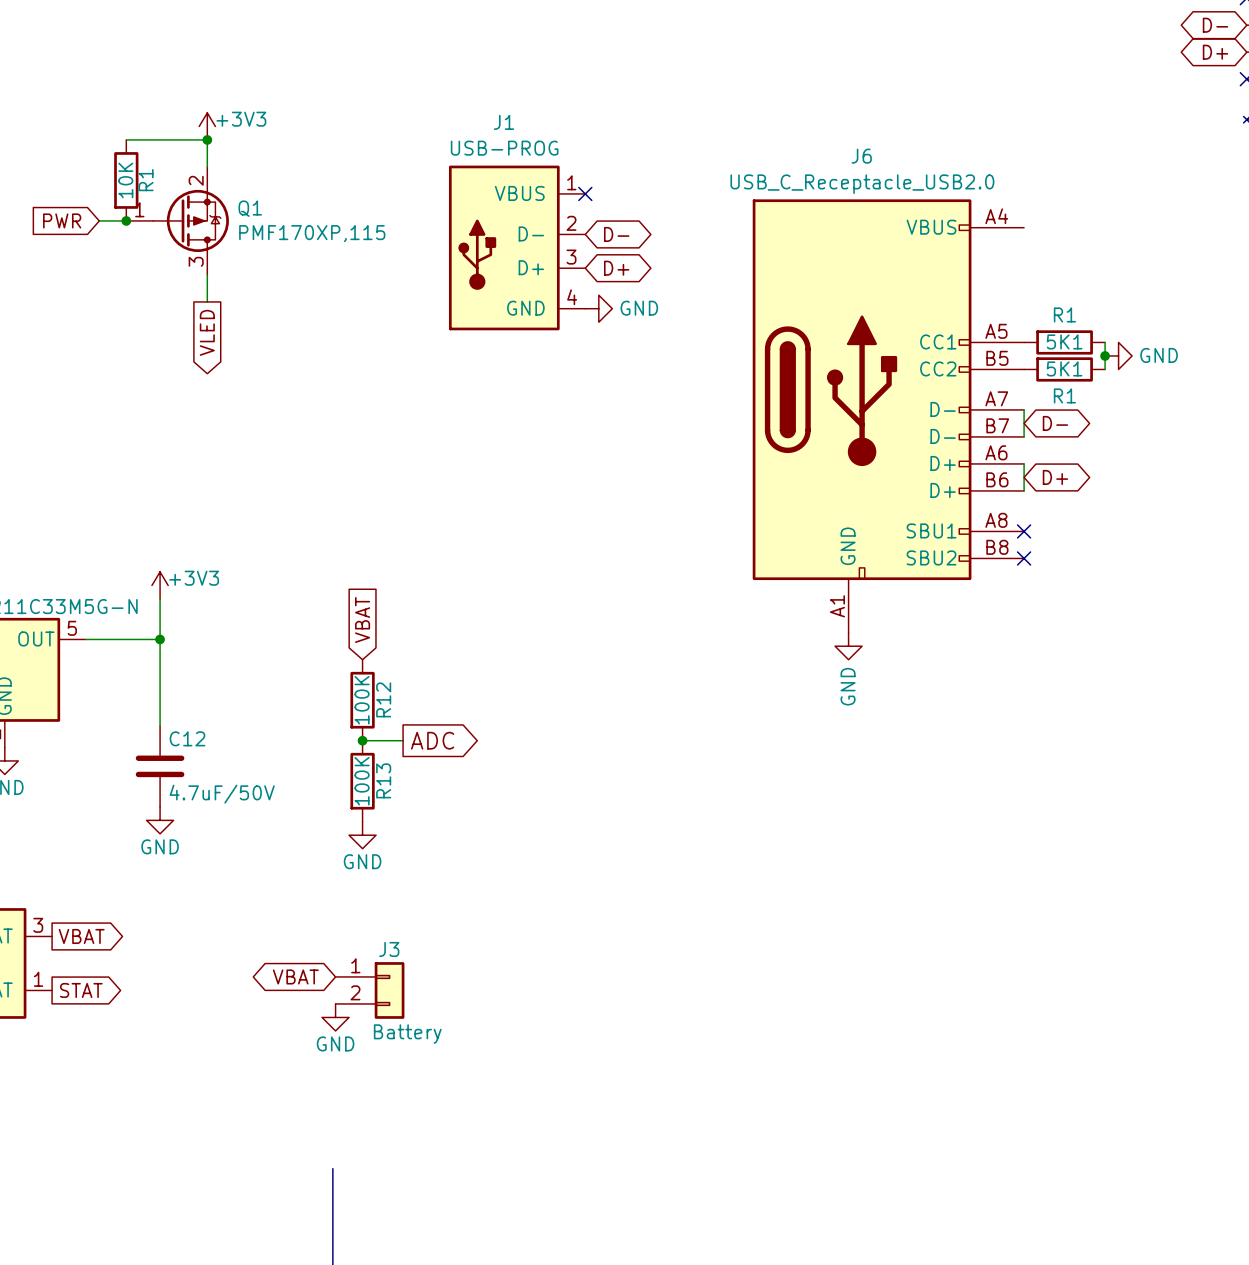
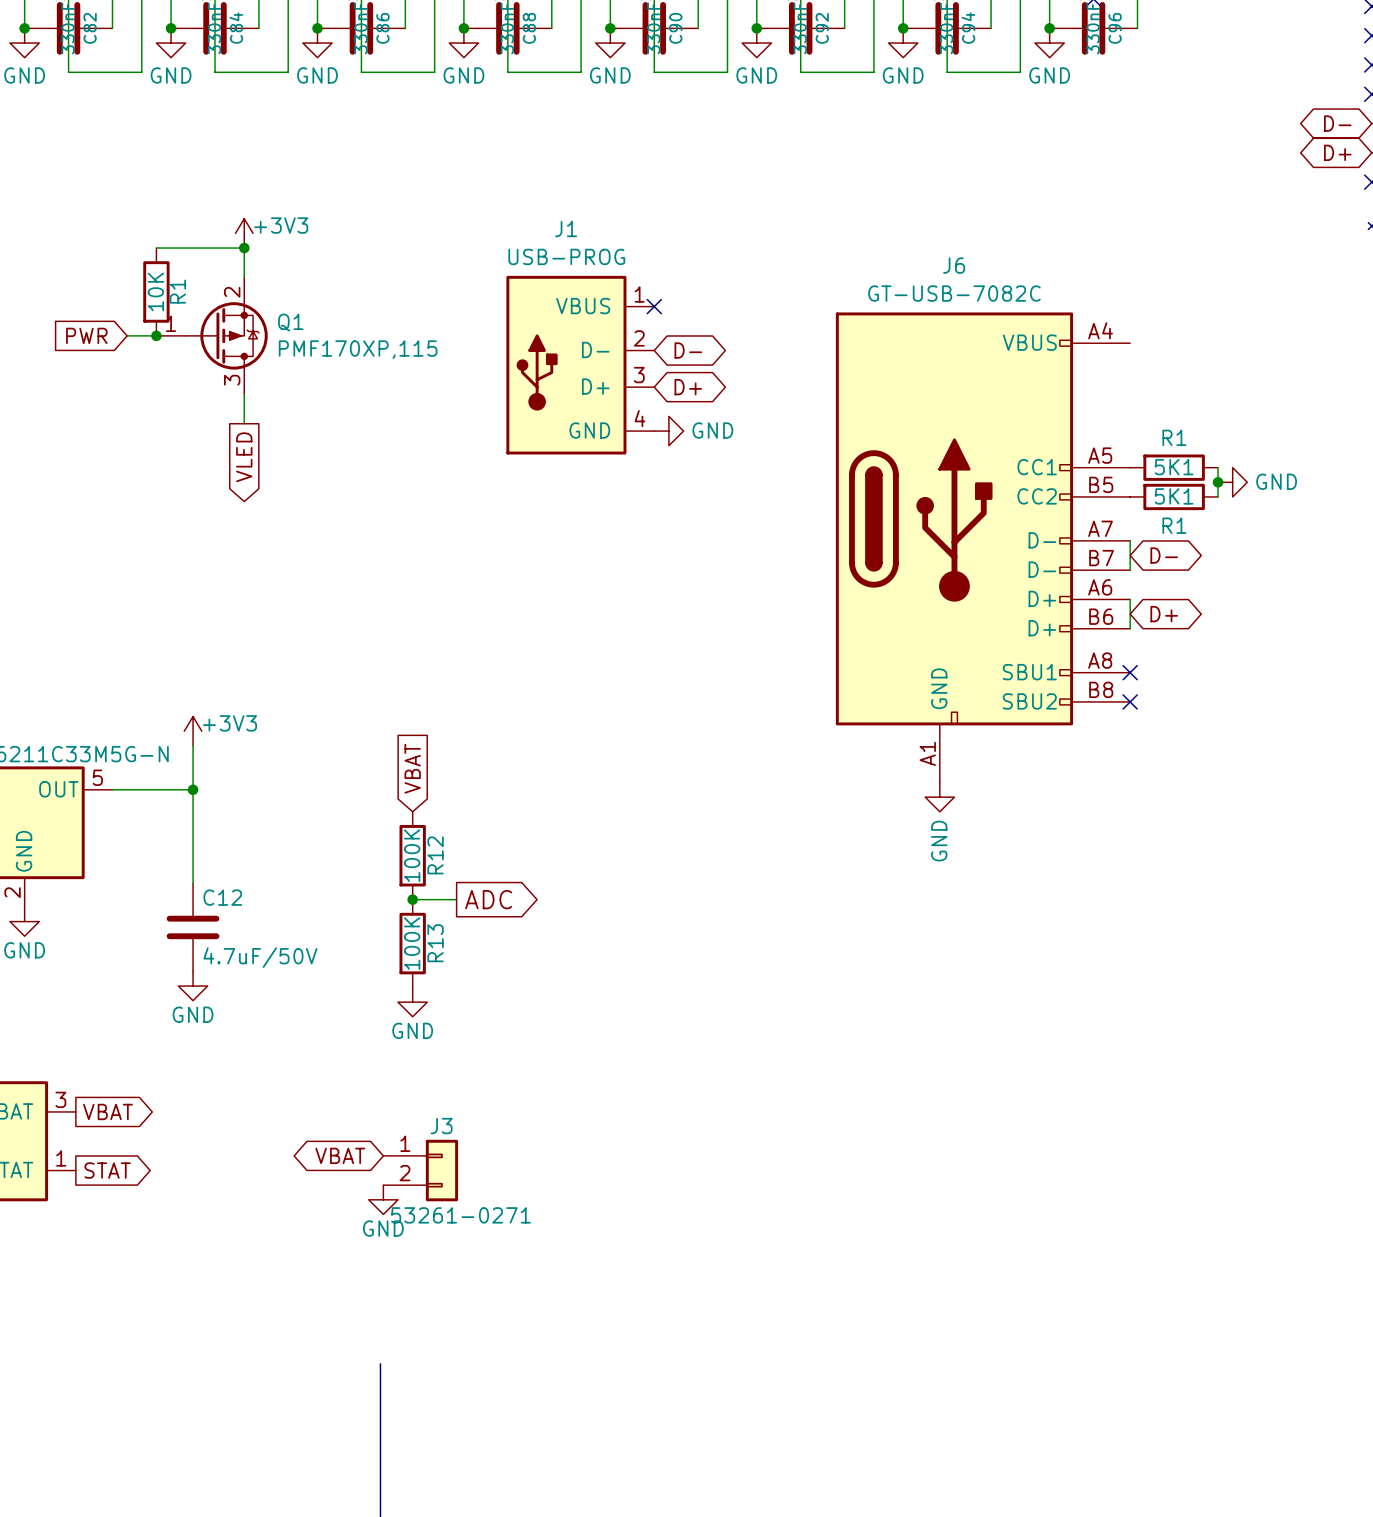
J6 value: USB_C_Receptacle_USB2.0 (862, 184) -> GT-USB-7082C (954, 293)
J3 value: Battery (407, 1034) -> 53261-0271 (460, 1215)

